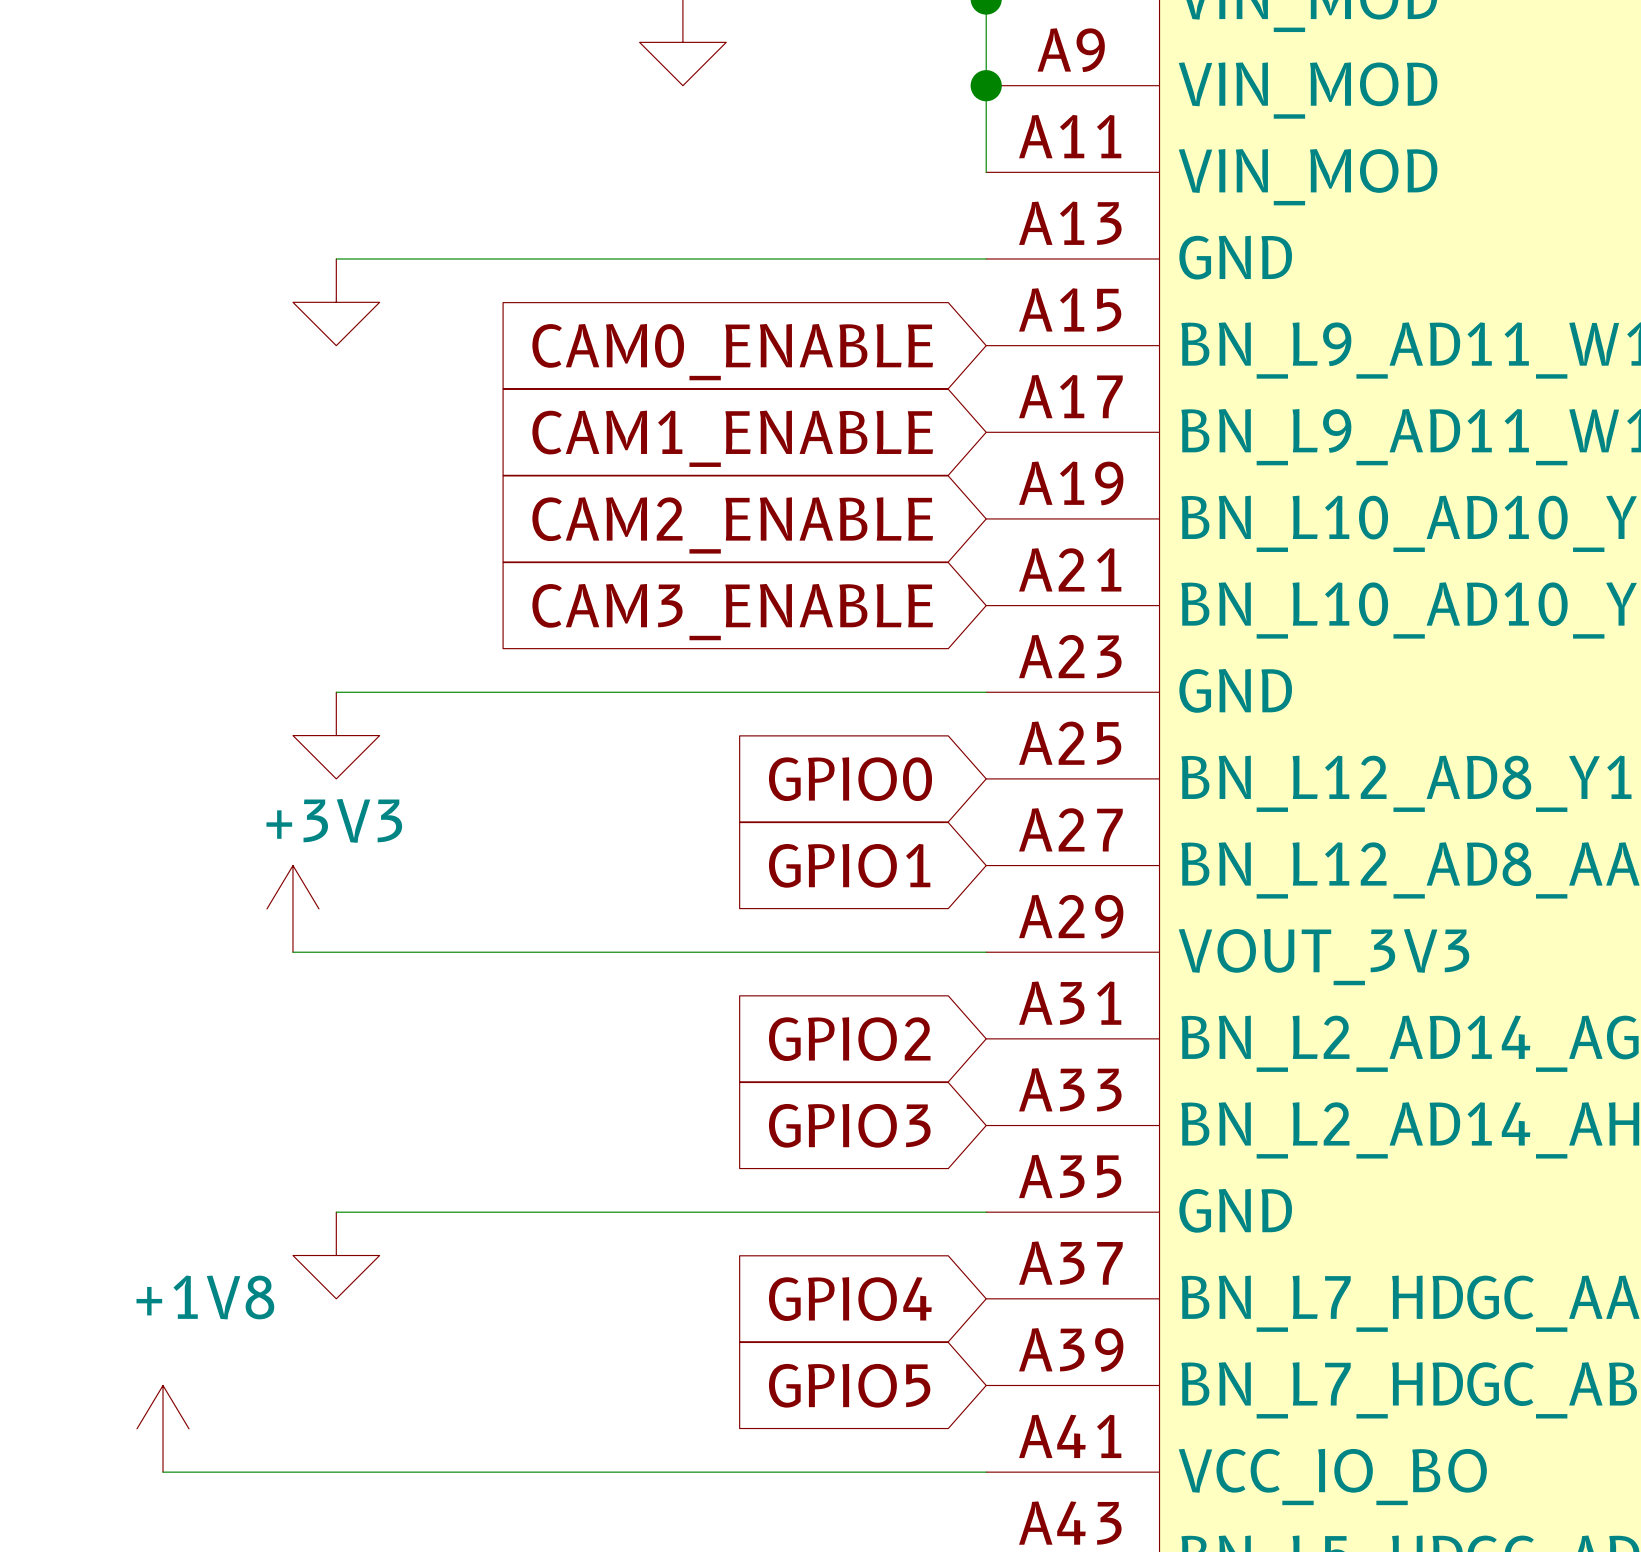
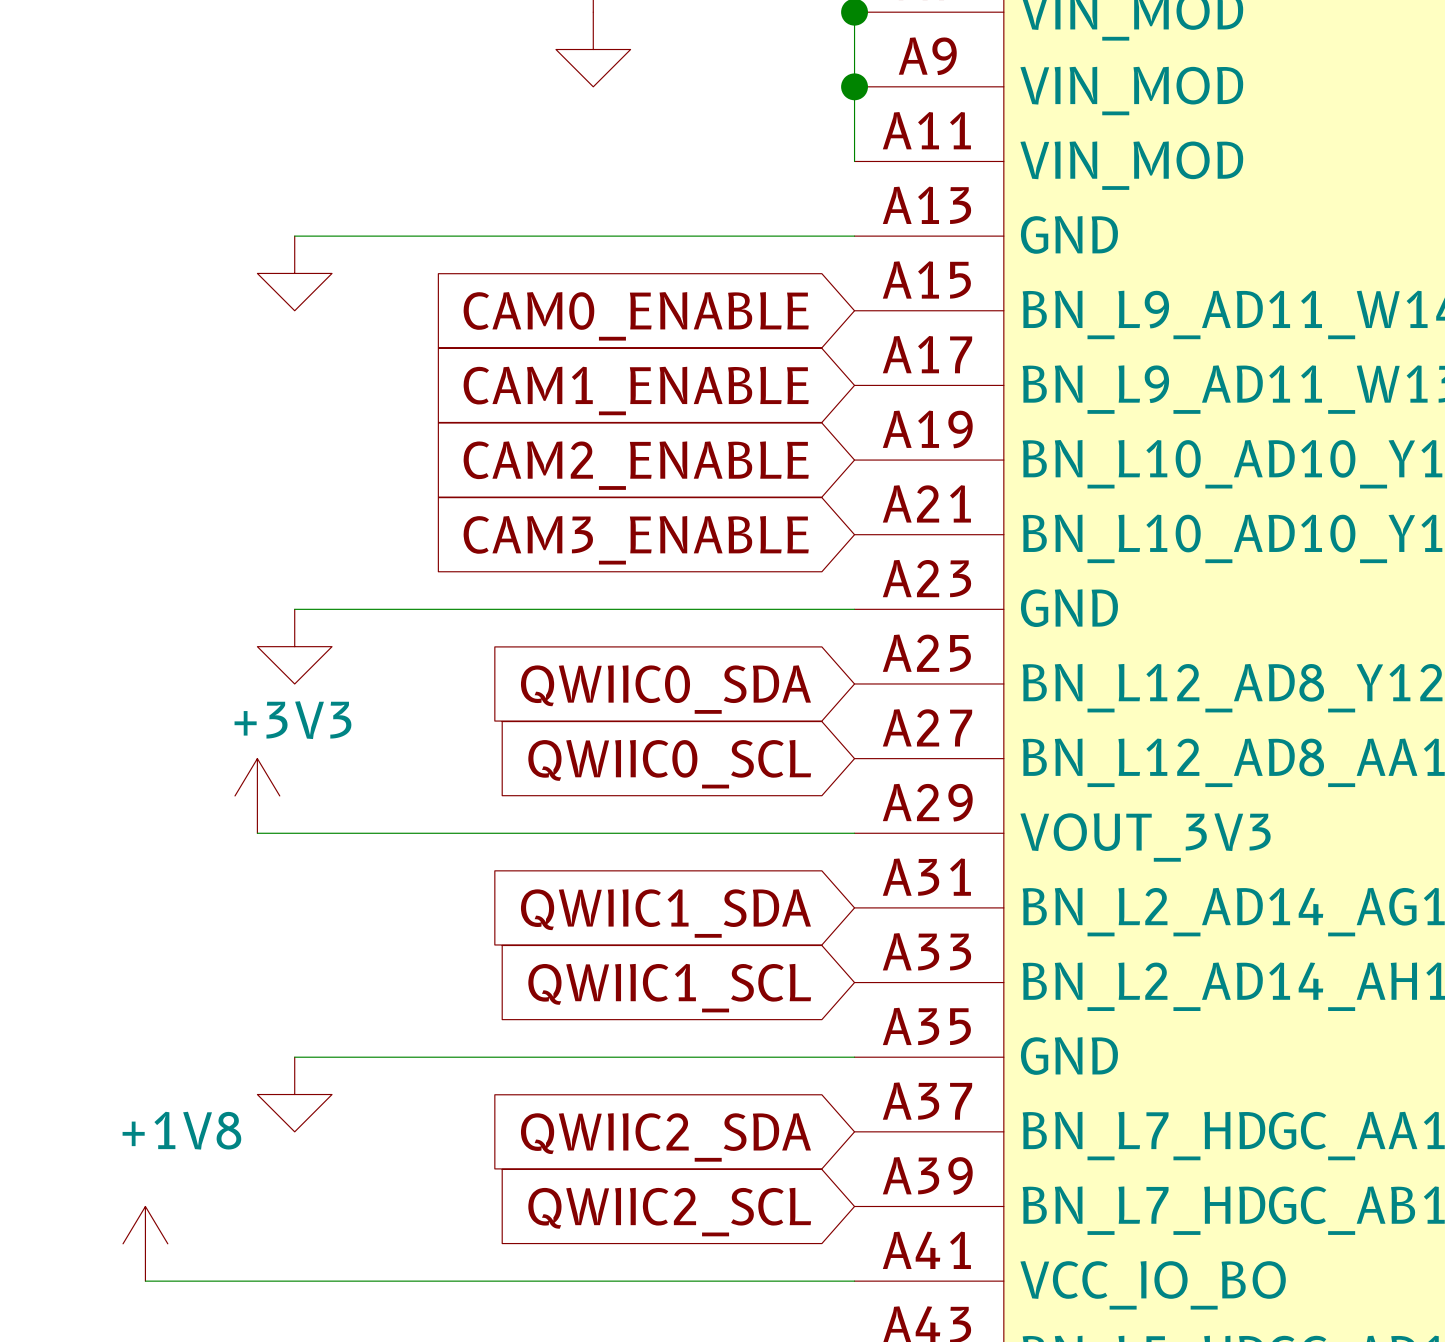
global label: GPIO0 (850, 779) -> QWIIC0_SDA (665, 689)
global label: GPIO1 (849, 865) -> QWIIC0_SCL (669, 764)
global label: GPIO2 (849, 1039) -> QWIIC1_SDA (665, 913)
global label: GPIO3 (849, 1125) -> QWIIC1_SCL (669, 988)
global label: GPIO4 (850, 1299) -> QWIIC2_SDA (665, 1137)
global label: GPIO5 (849, 1385) -> QWIIC2_SCL (669, 1212)

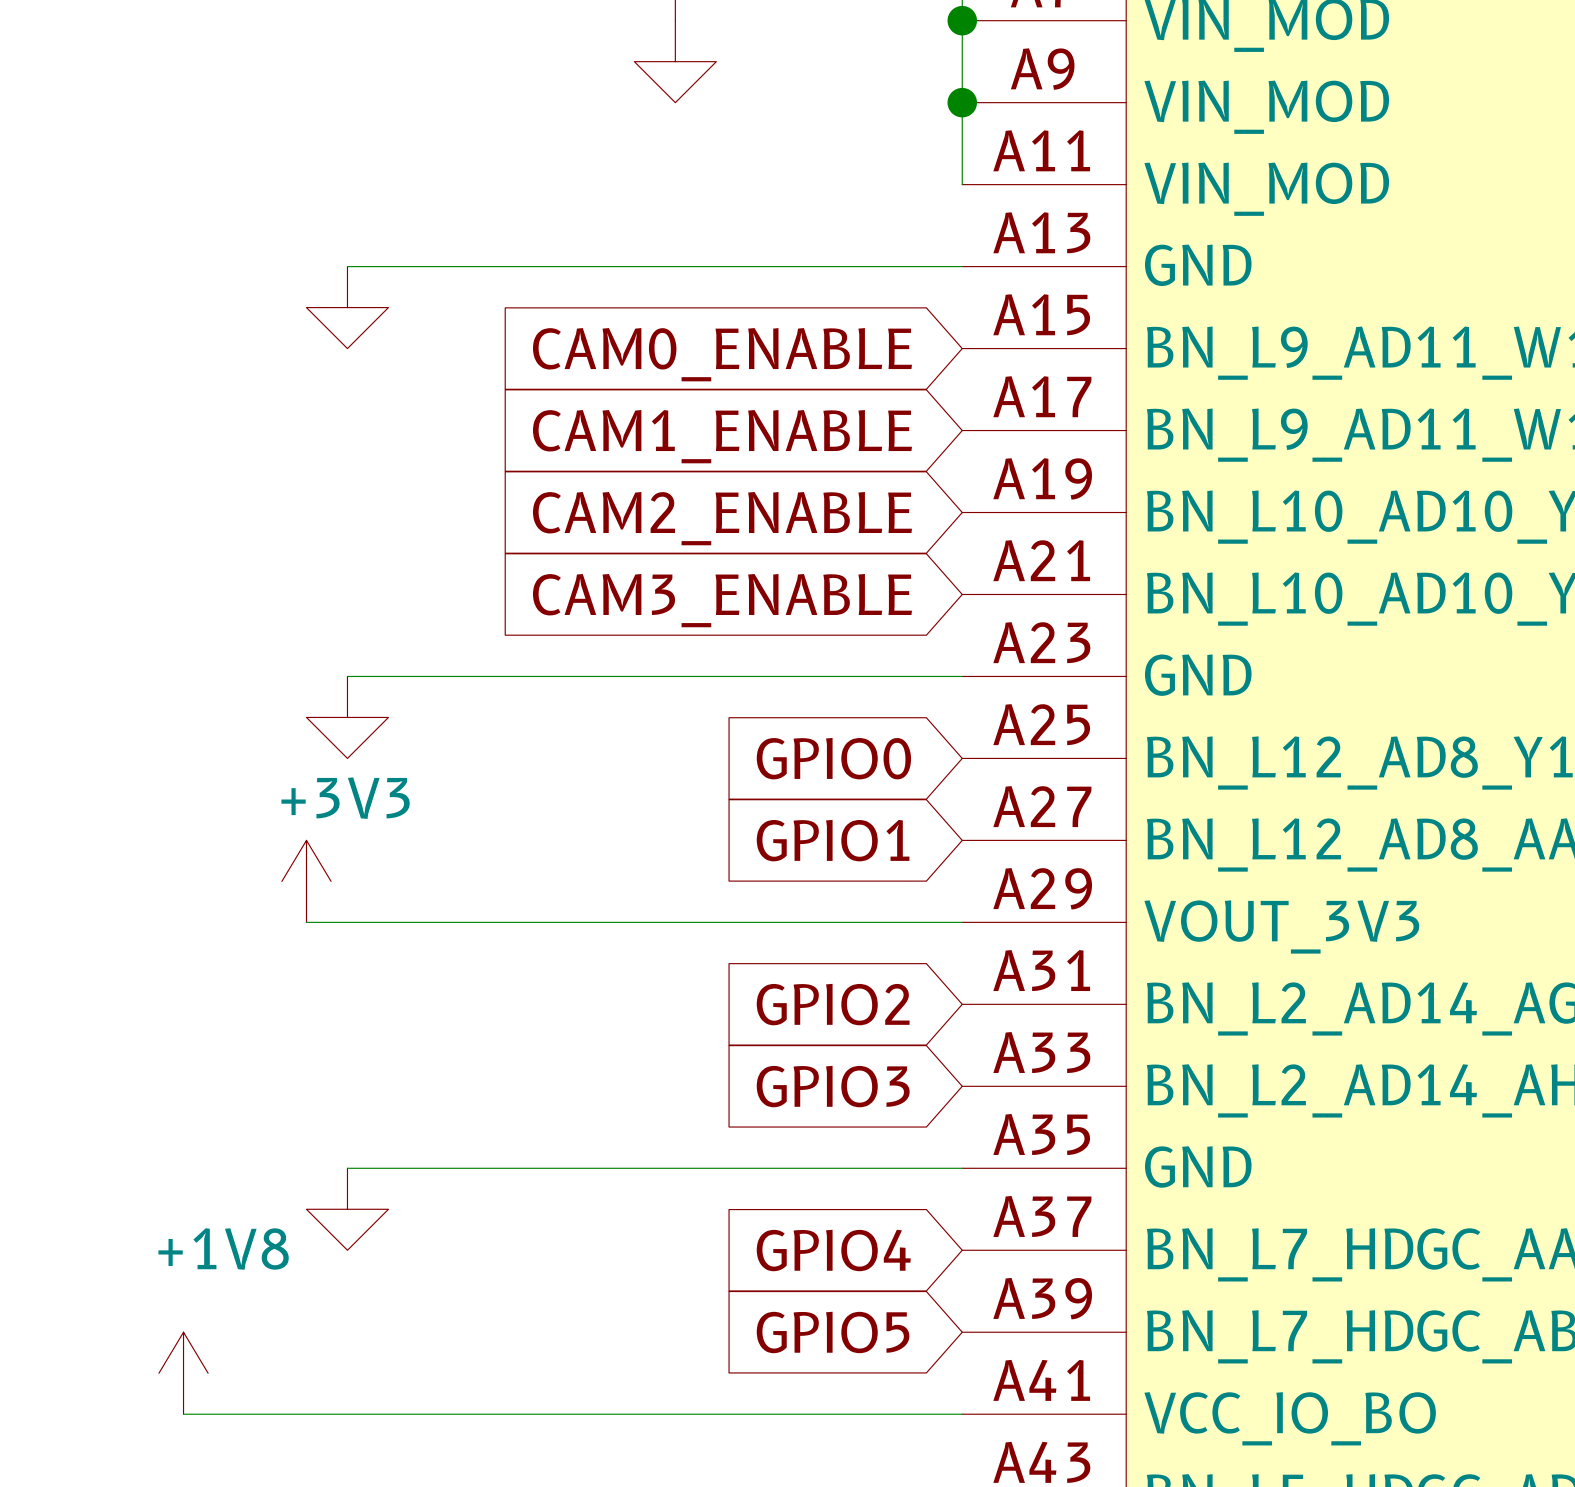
global label: QWIIC0_SDA (665, 689) -> GPIO0 (833, 758)
global label: QWIIC0_SCL (669, 764) -> GPIO1 (833, 840)
global label: QWIIC1_SDA (665, 913) -> GPIO2 (833, 1004)
global label: QWIIC1_SCL (669, 988) -> GPIO3 (833, 1086)
global label: QWIIC2_SDA (665, 1137) -> GPIO4 (833, 1250)
global label: QWIIC2_SCL (669, 1212) -> GPIO5 (833, 1332)

